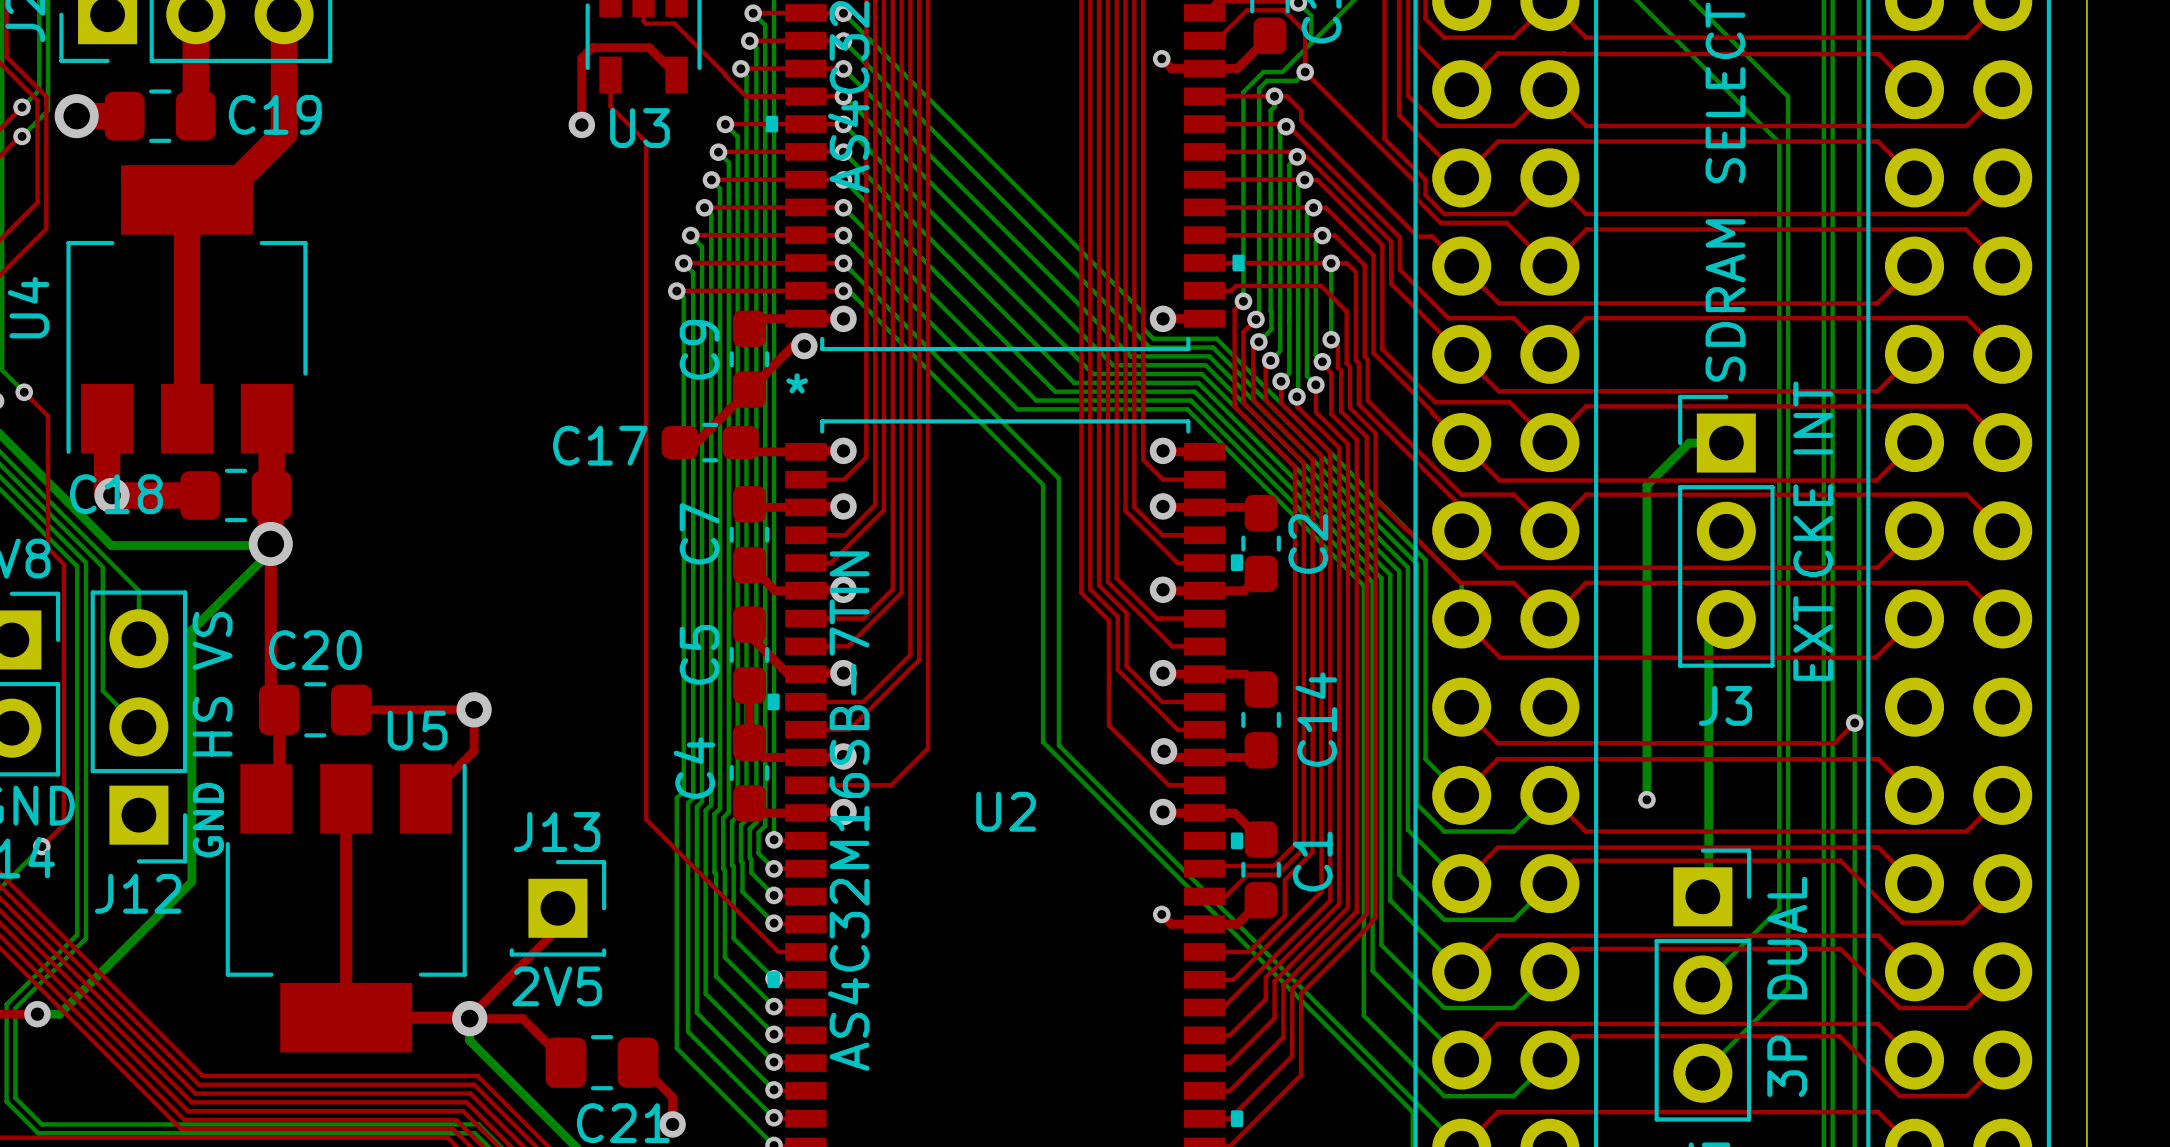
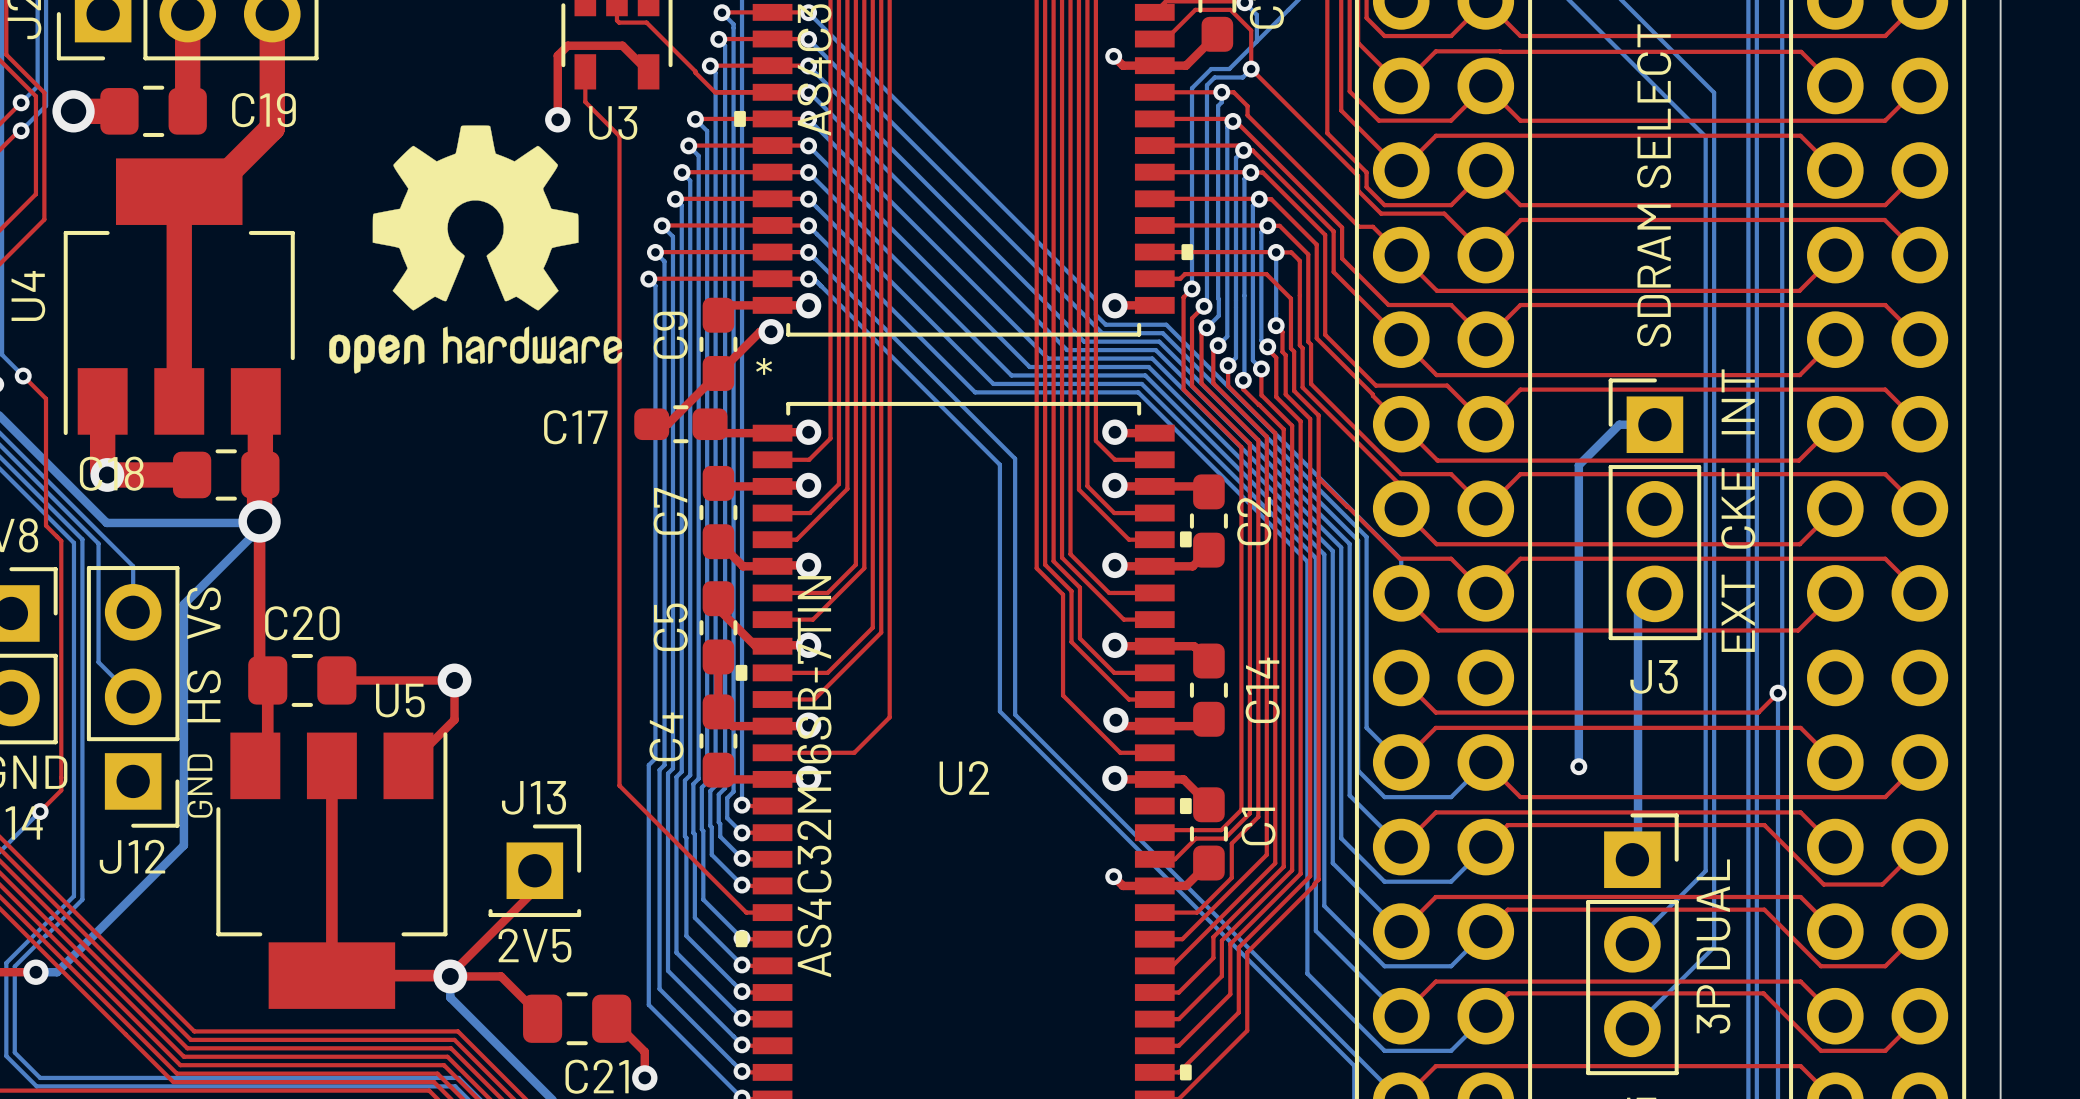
drawing: none -> [329, 125, 623, 374]

